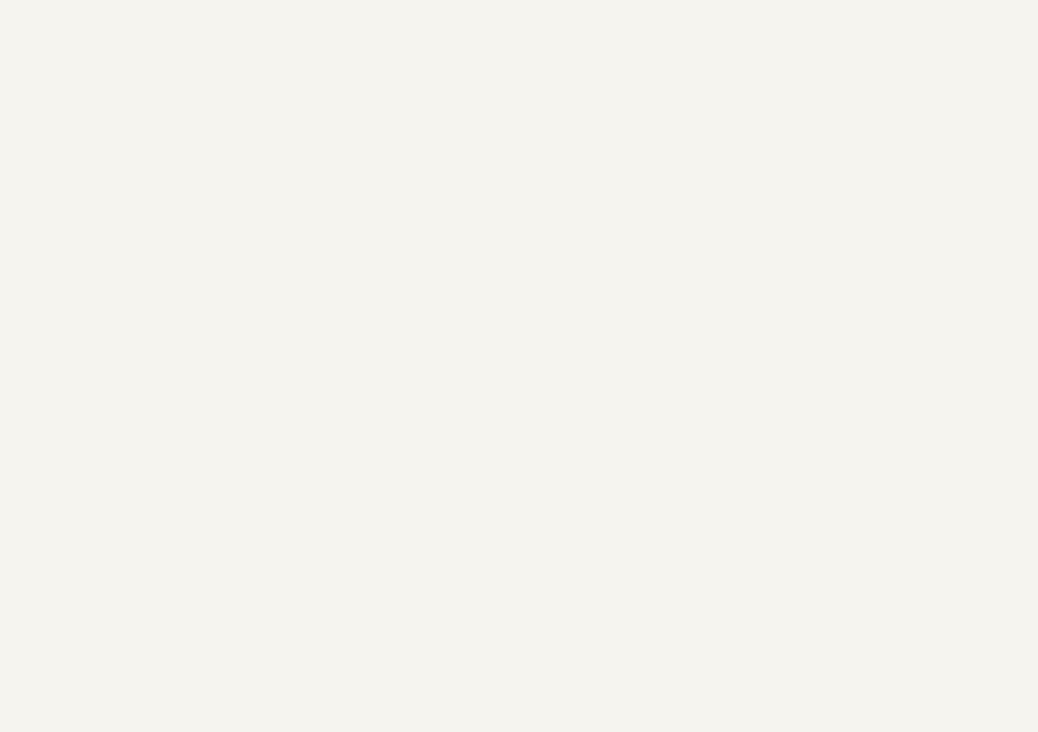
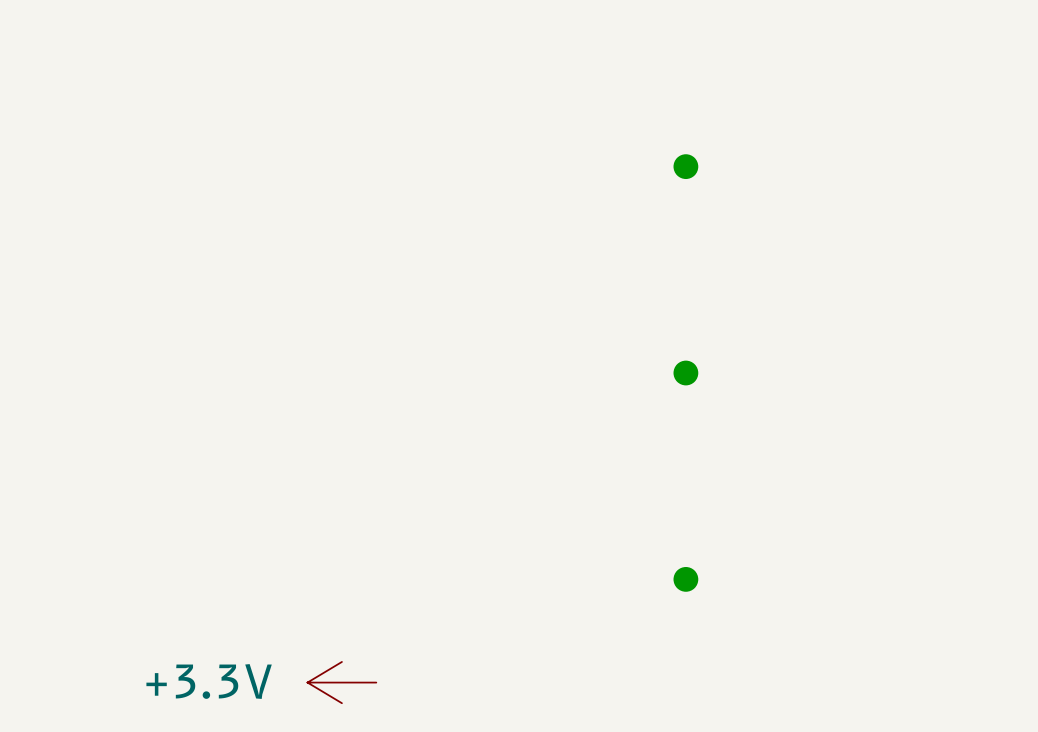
junction: none -> (685, 166)
junction: none -> (685, 373)
junction: none -> (685, 579)
power symbol: none -> +3.3V (341, 682)

